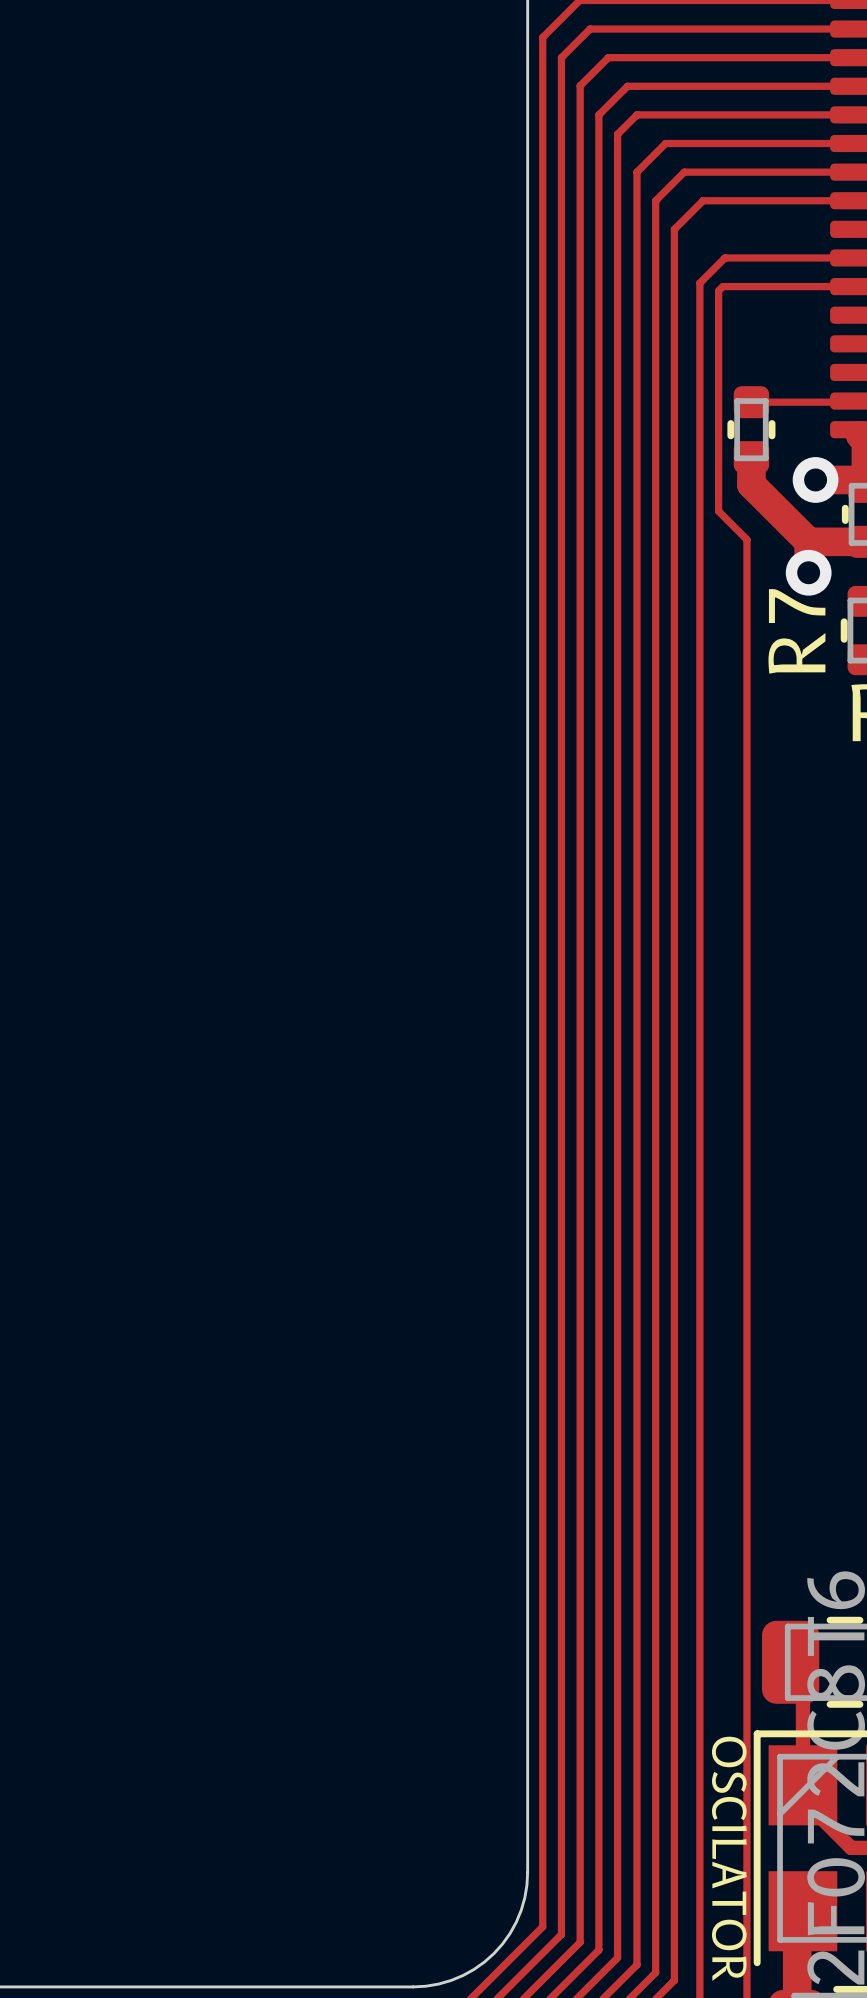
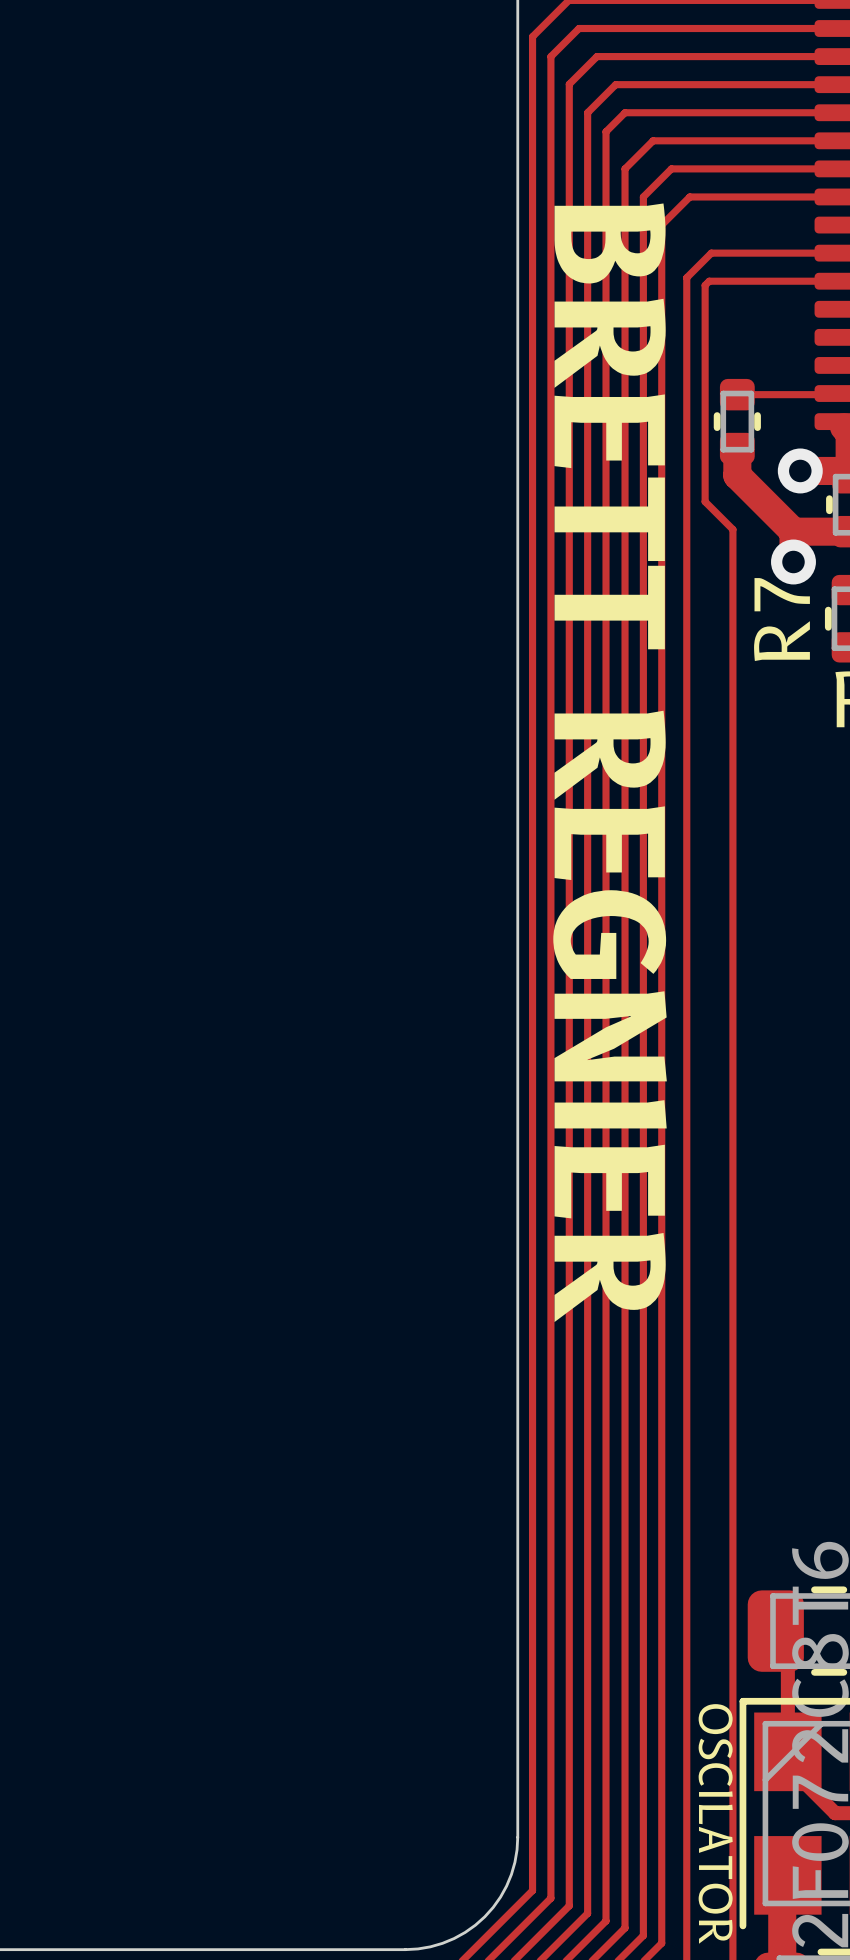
text: none -> BRETT REGNIER (610, 762)

